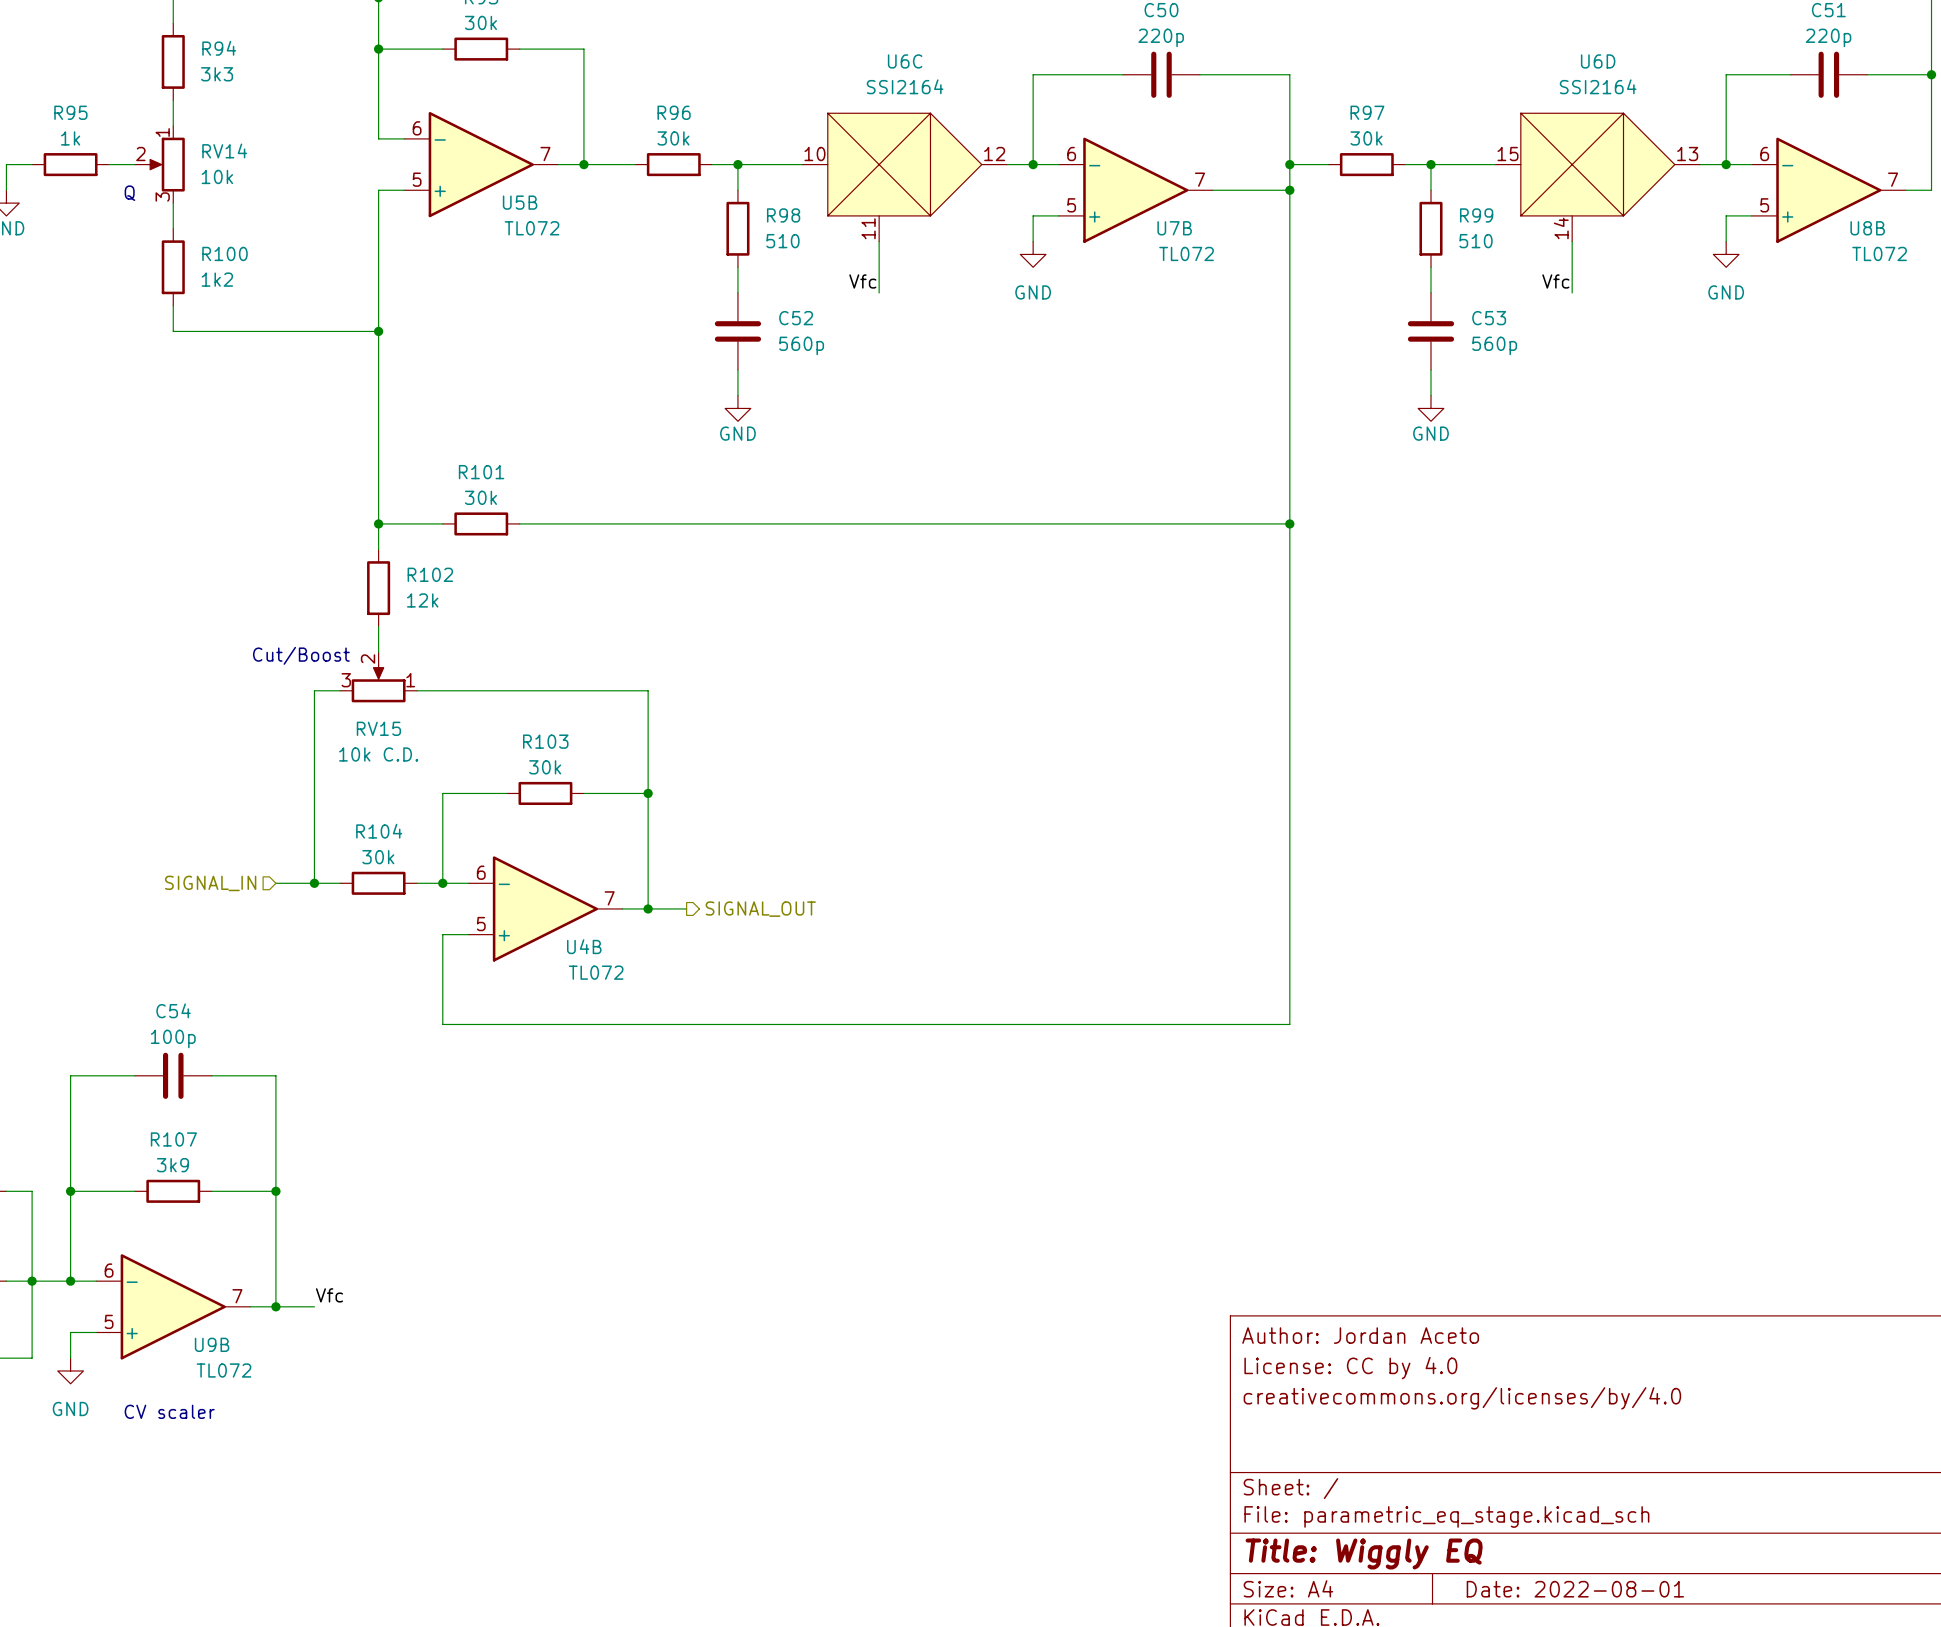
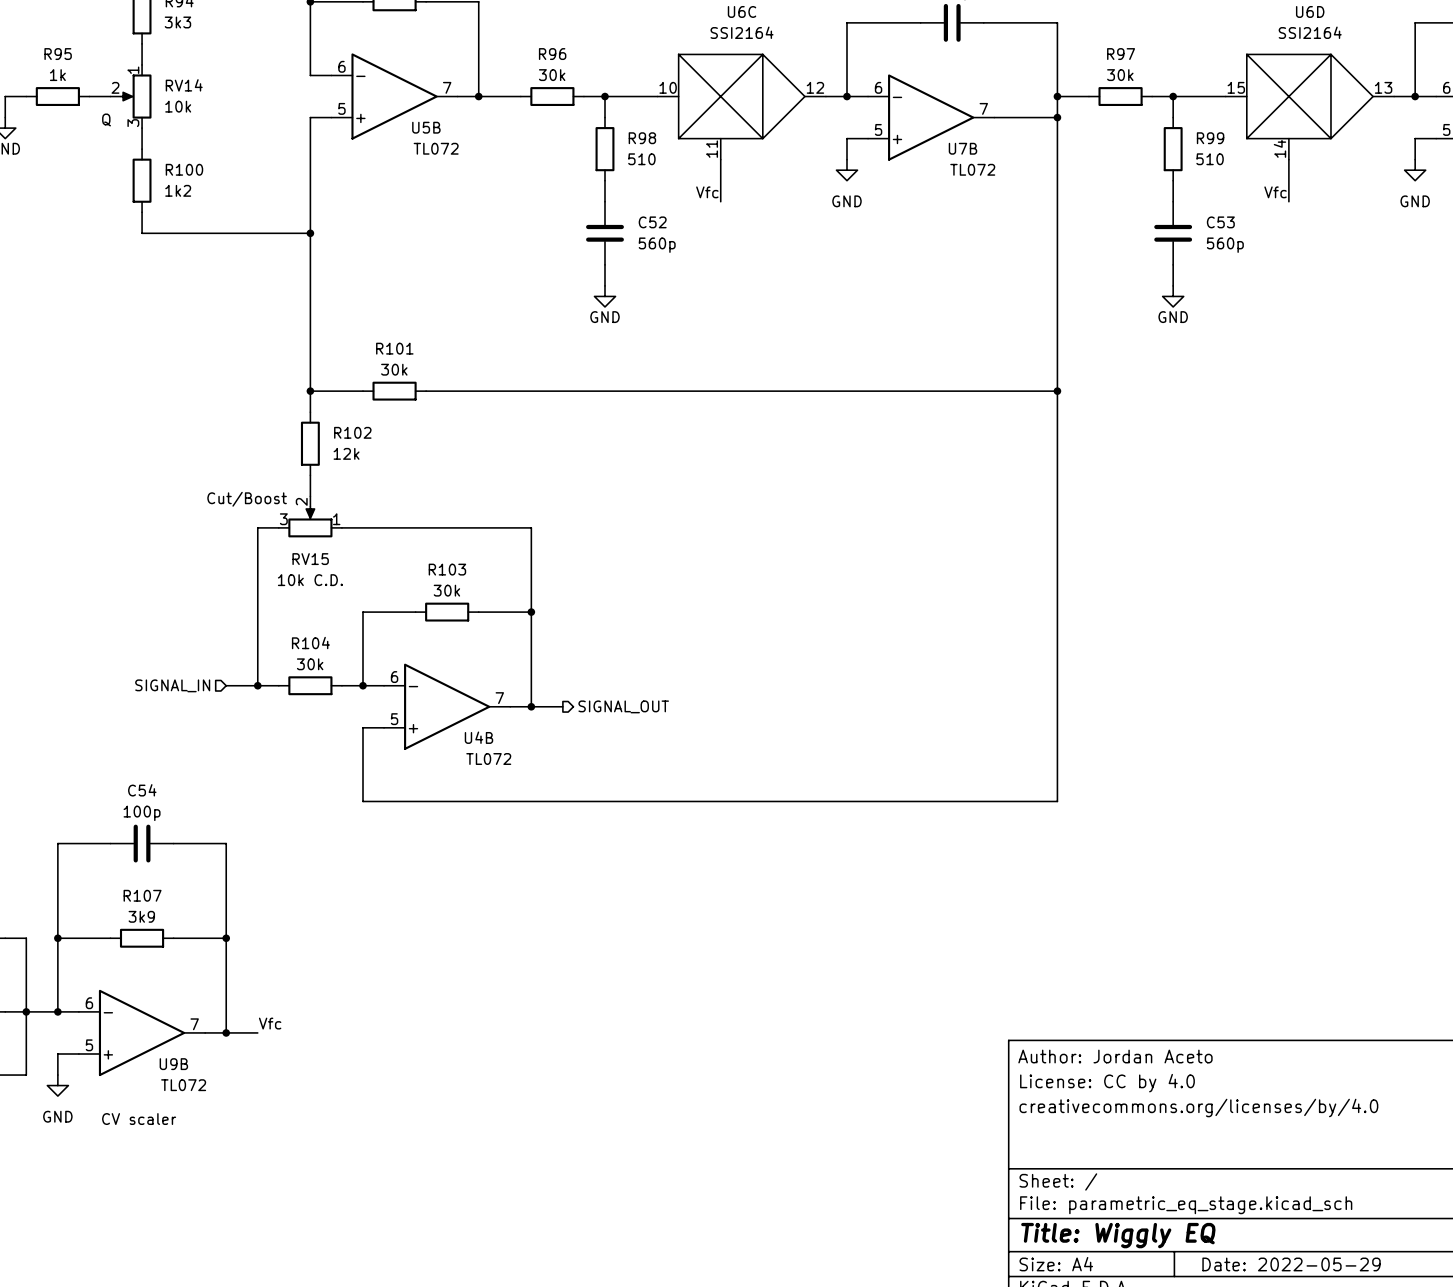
title block: Date: 2022-08-01 (1575, 1589) -> Date: 2022-05-29 (1291, 1264)

